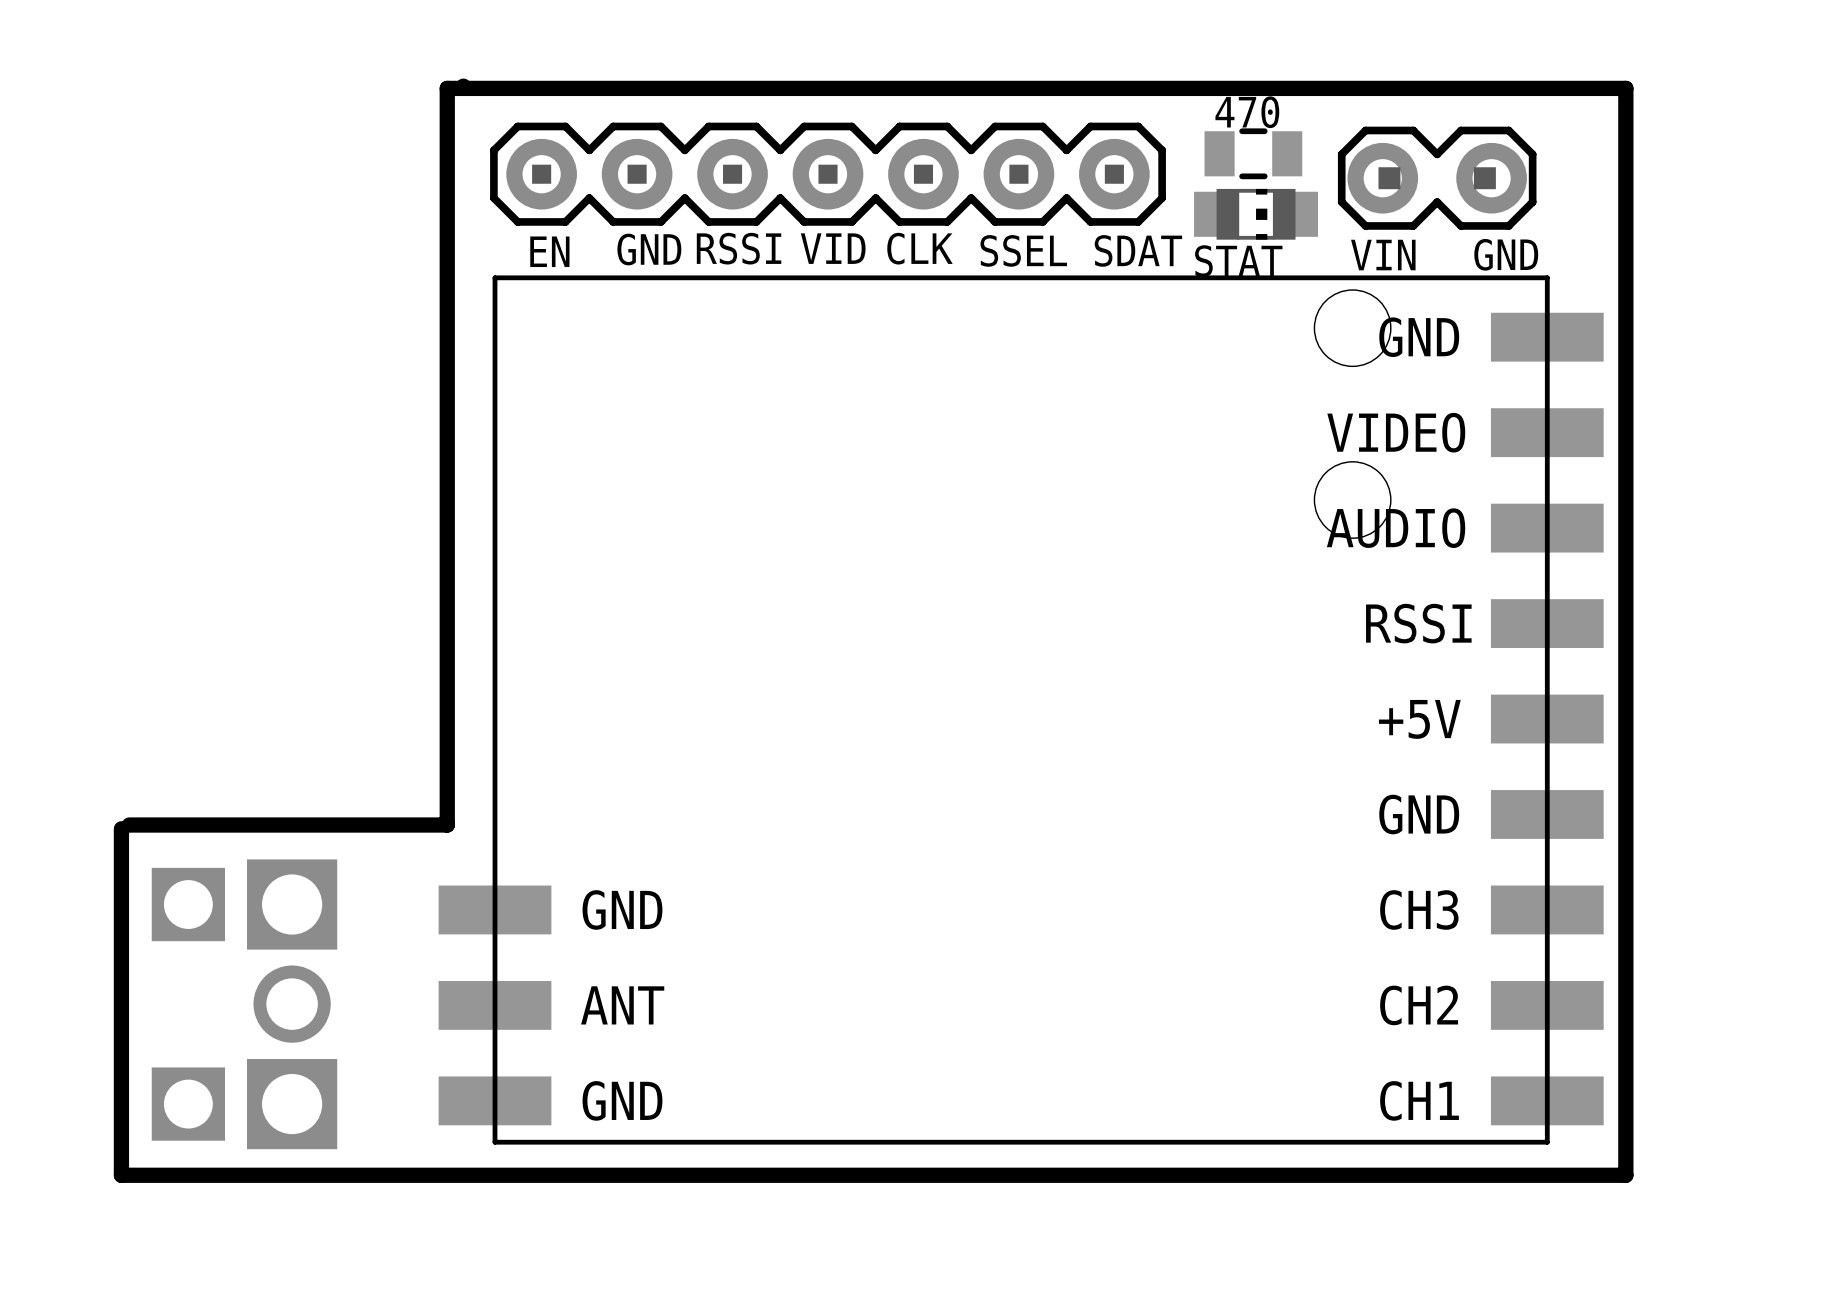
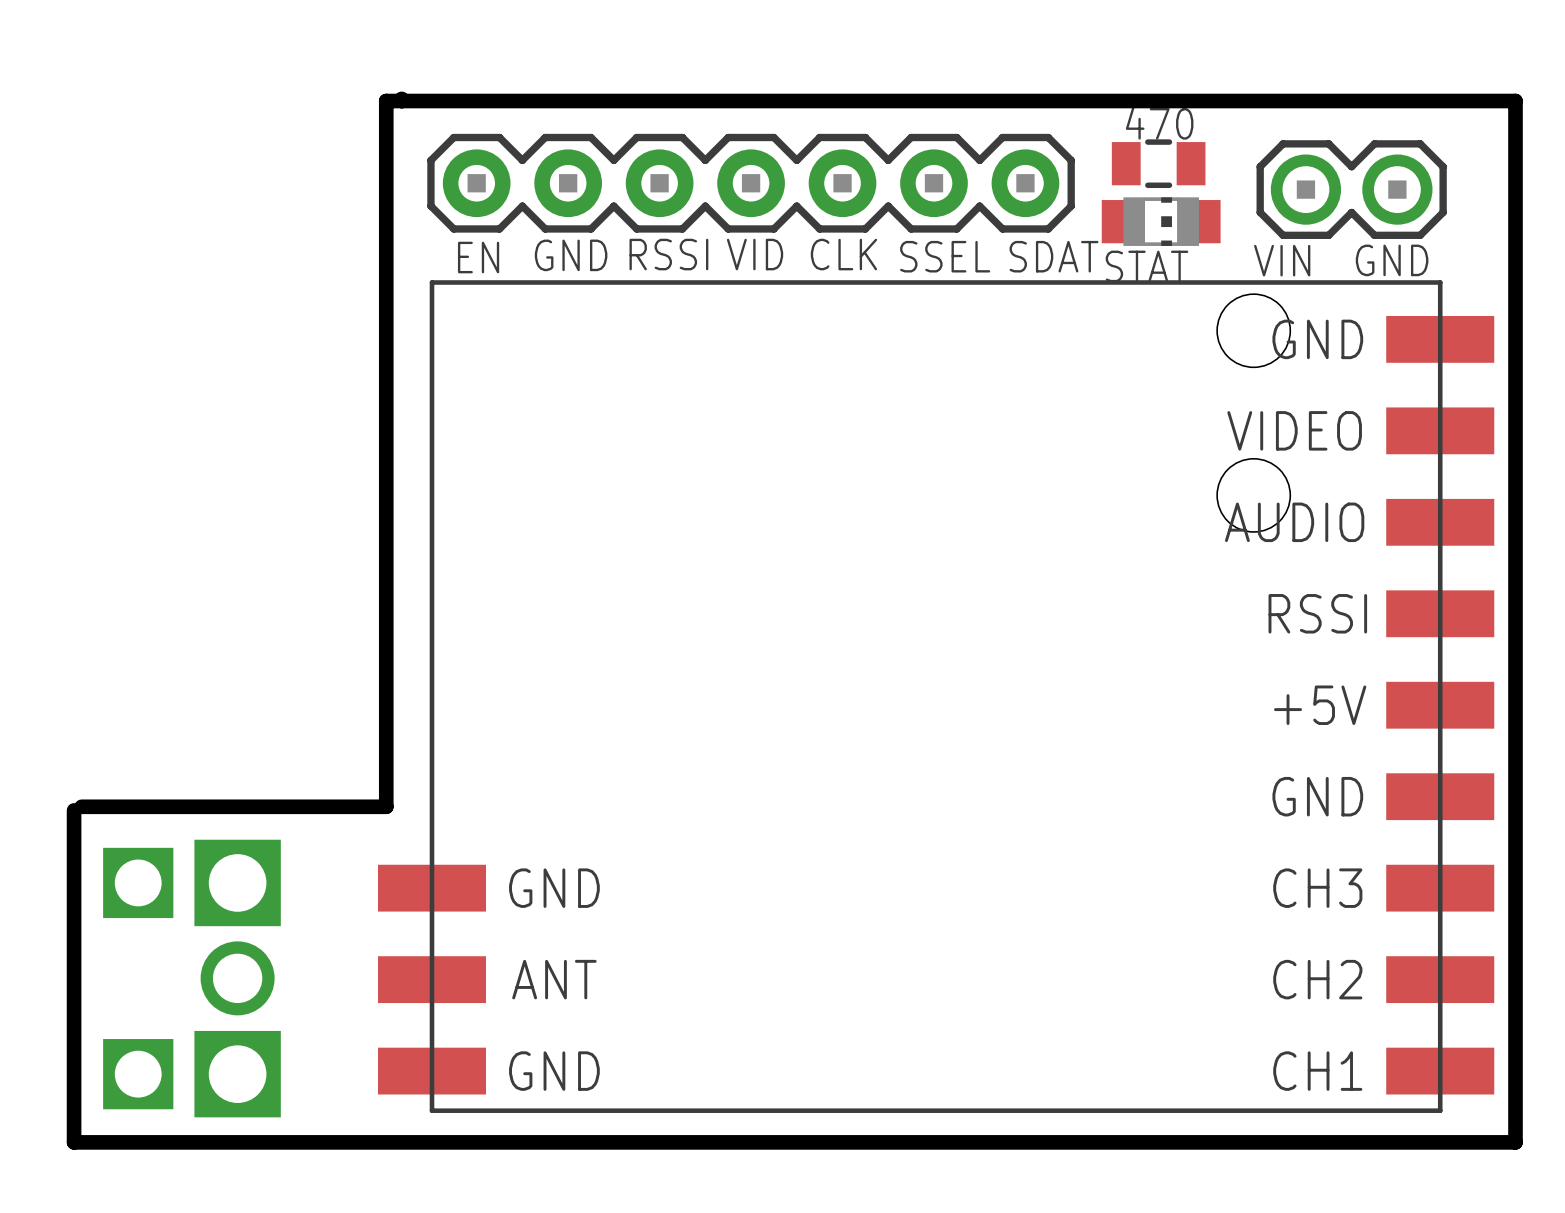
part footprint: [1337, 126, 1537, 230] -> [1256, 140, 1447, 239]

